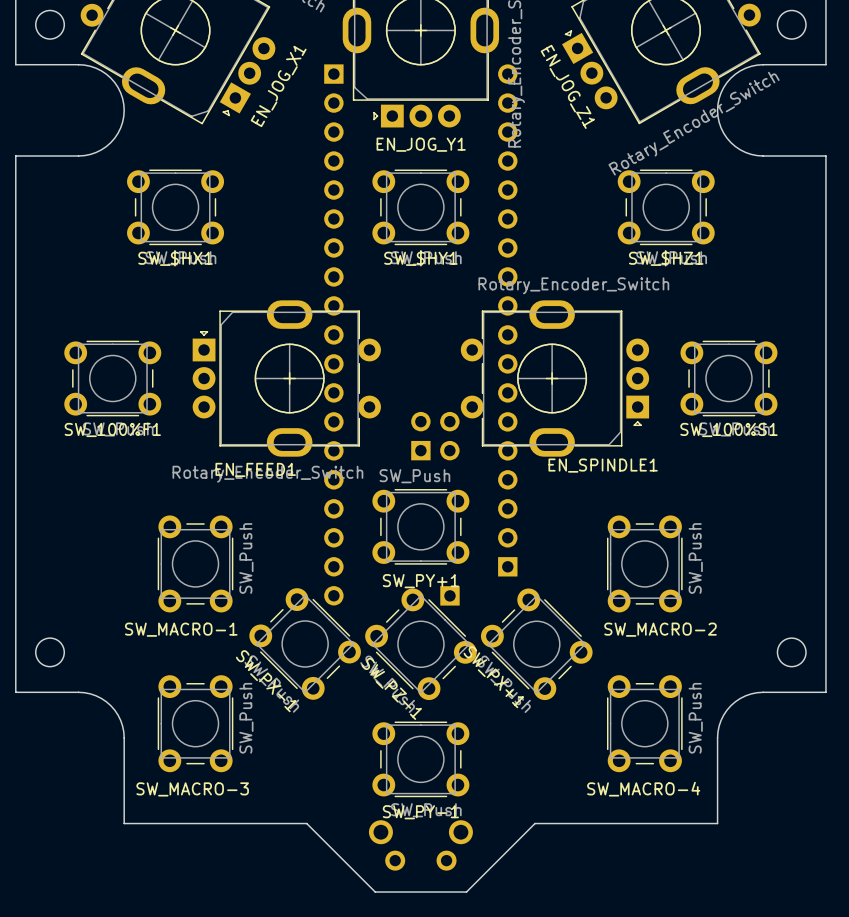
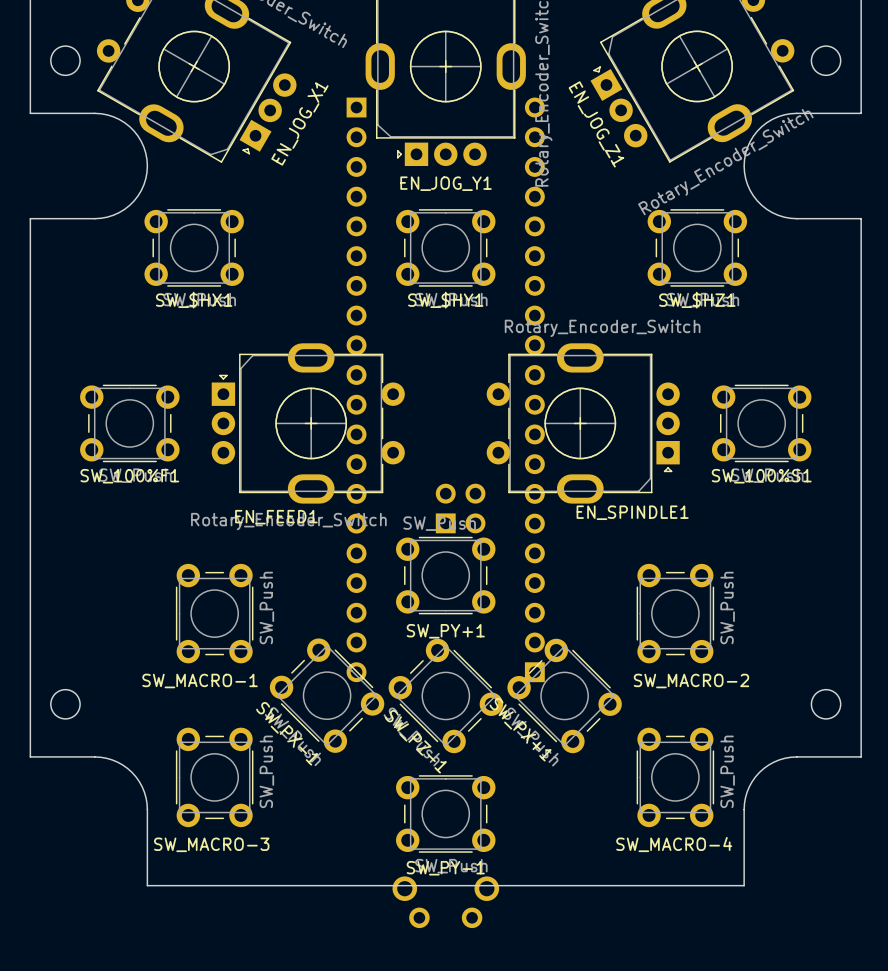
board edge: (15, 64) (78, 64) (96, 68) (106, 74) (114, 82) (122, 98) (124, 110) (122, 122) (118, 133) (110, 142) (101, 149) (84, 155) (15, 155) (15, 178) -> (30, 101) (30, 113) (101, 113) (119, 119) (129, 126) (138, 136) (143, 147) (147, 166) (145, 178) (138, 195) (129, 205) (113, 215) (94, 218) (30, 218)
part footprint: [324, 64, 344, 606] -> [346, 97, 367, 683]
board edge: (825, 64) (763, 64) (745, 68) (735, 74) (727, 82) (719, 98) (717, 110) (719, 122) (723, 133) (730, 142) (740, 149) (757, 155) (825, 155) (825, 178) -> (861, 101) (861, 113) (790, 113) (772, 119) (761, 126) (753, 136) (745, 153) (744, 166) (747, 184) (753, 195) (761, 205) (778, 215) (796, 218) (861, 218)
part: (507, 320) -> none
part: none -> (534, 389)
part position: (435, 436) -> (460, 508)
part: (449, 595) -> none
board edge: (15, 692) (84, 692) (101, 698) (114, 710) (120, 720) (123, 732) (124, 823) (306, 823) (375, 892) (466, 892) (534, 823) (717, 823) (717, 732) (721, 720) (727, 710) (740, 698) (757, 692) (825, 692) -> (30, 745) (30, 756) (106, 758) (122, 765) (135, 776) (144, 792) (147, 803) (147, 885) (744, 885) (744, 803) (747, 792) (755, 776) (768, 765) (785, 758) (861, 756) (861, 745)

